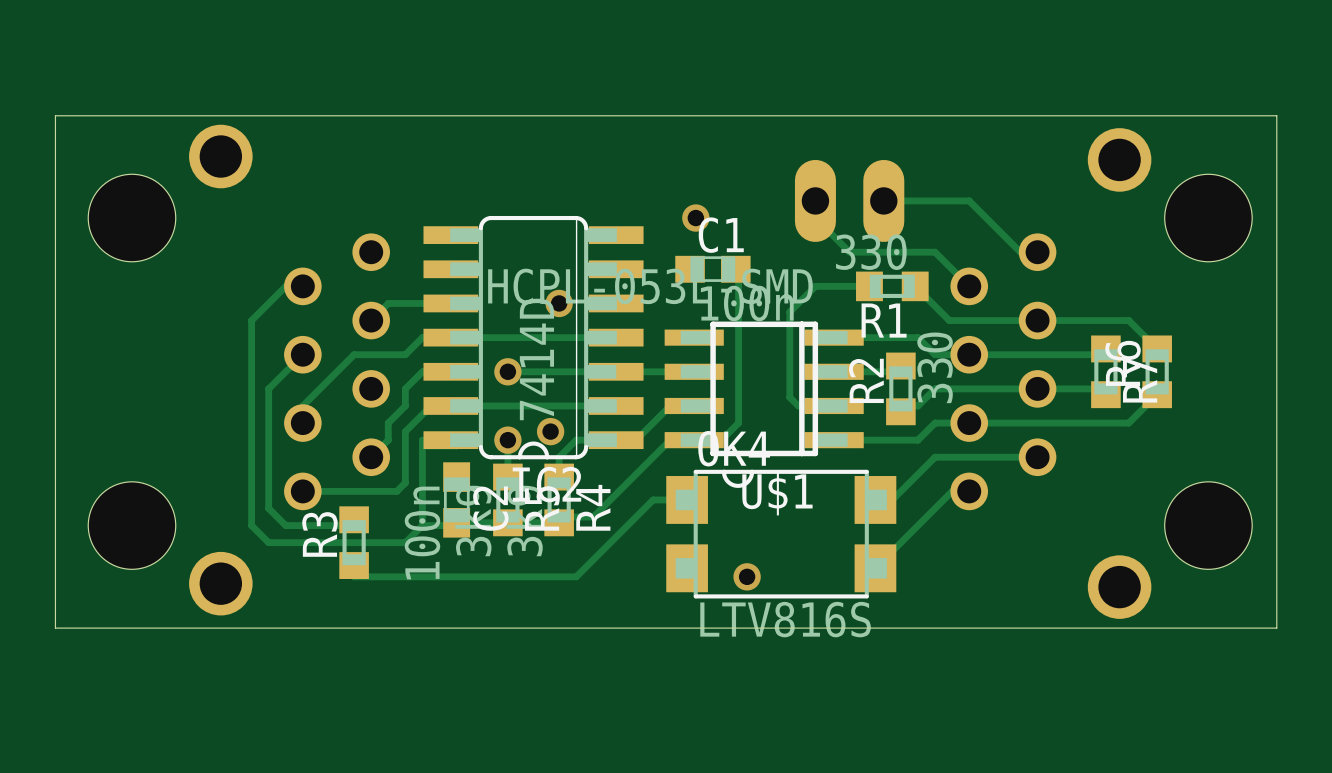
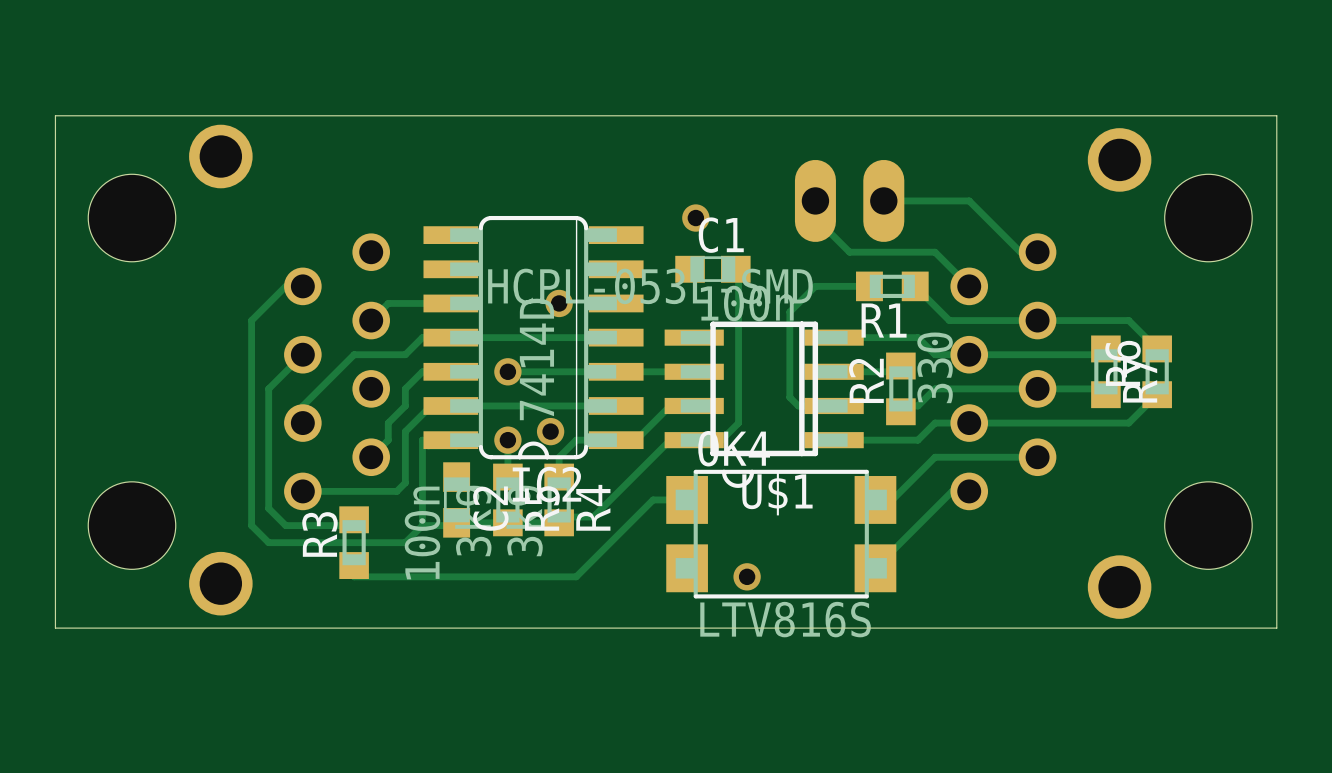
R1 value: 330 (871, 252) -> none

